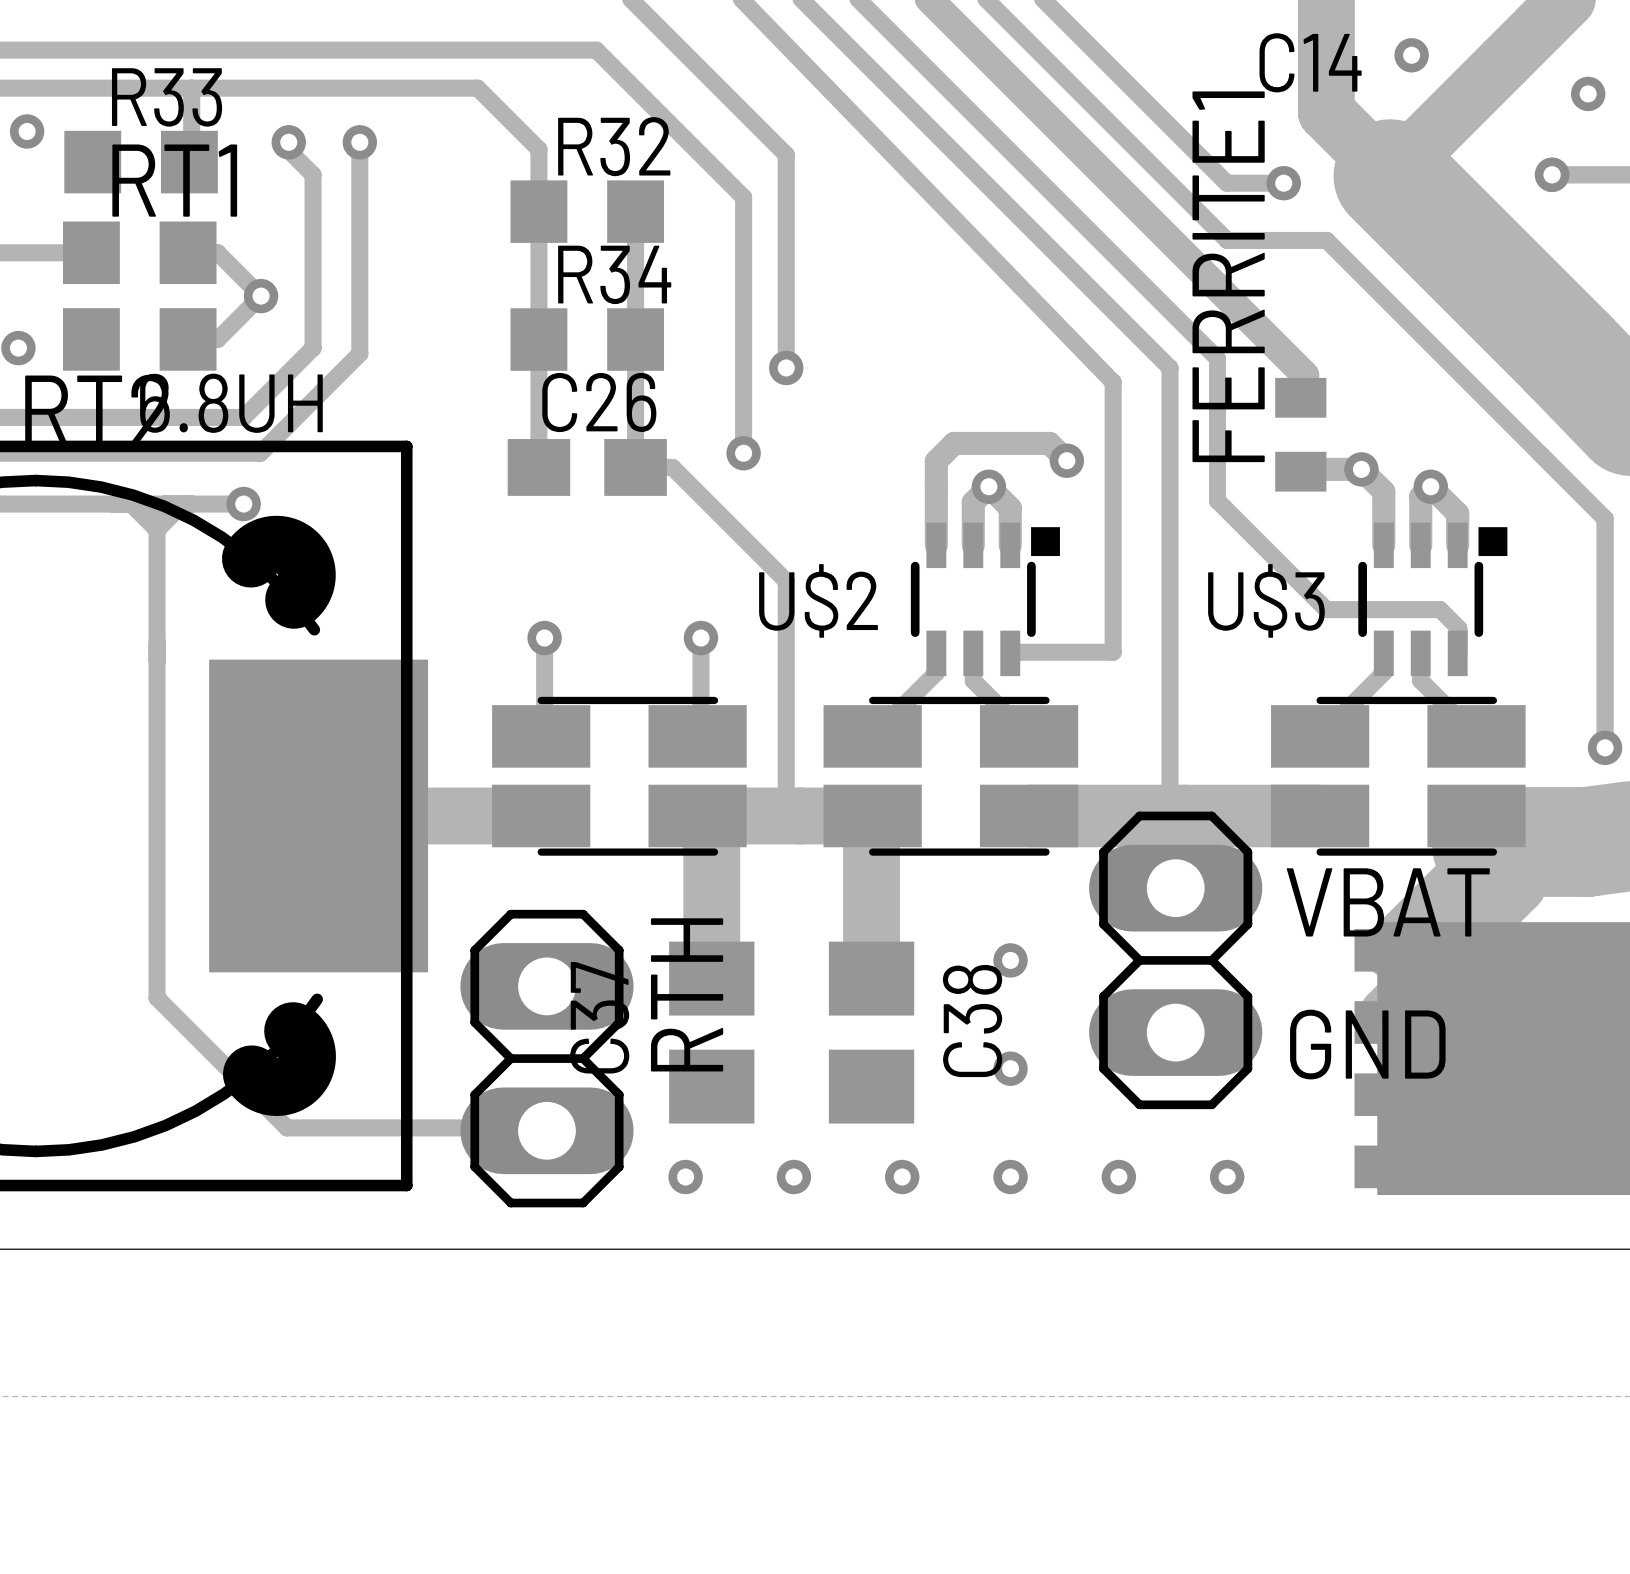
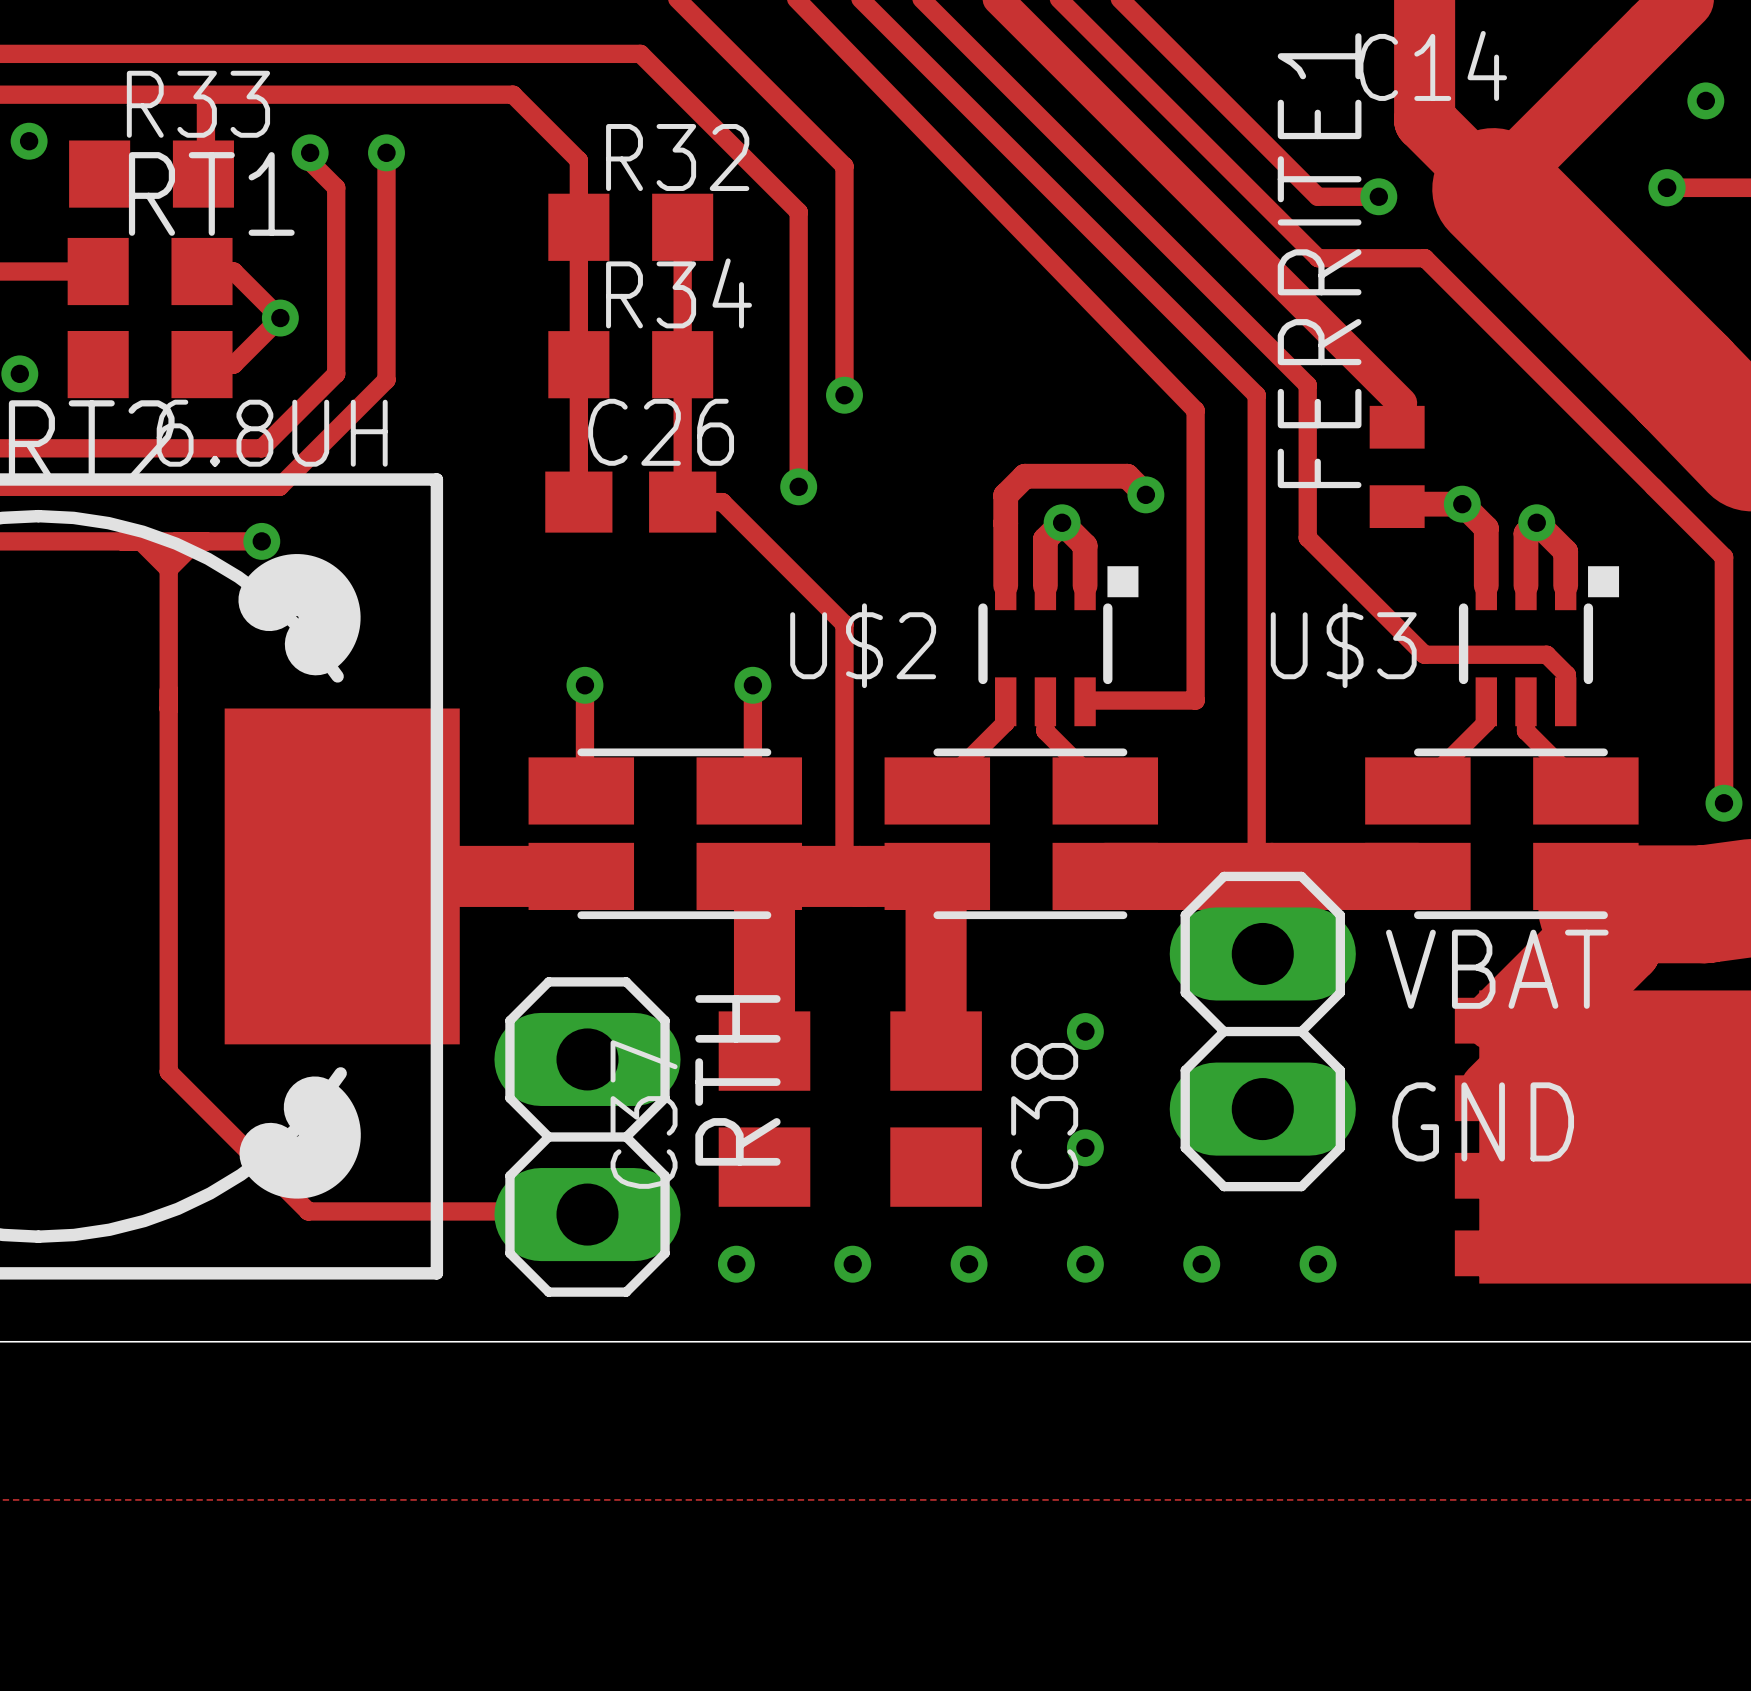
via: (1411, 55) -> none

